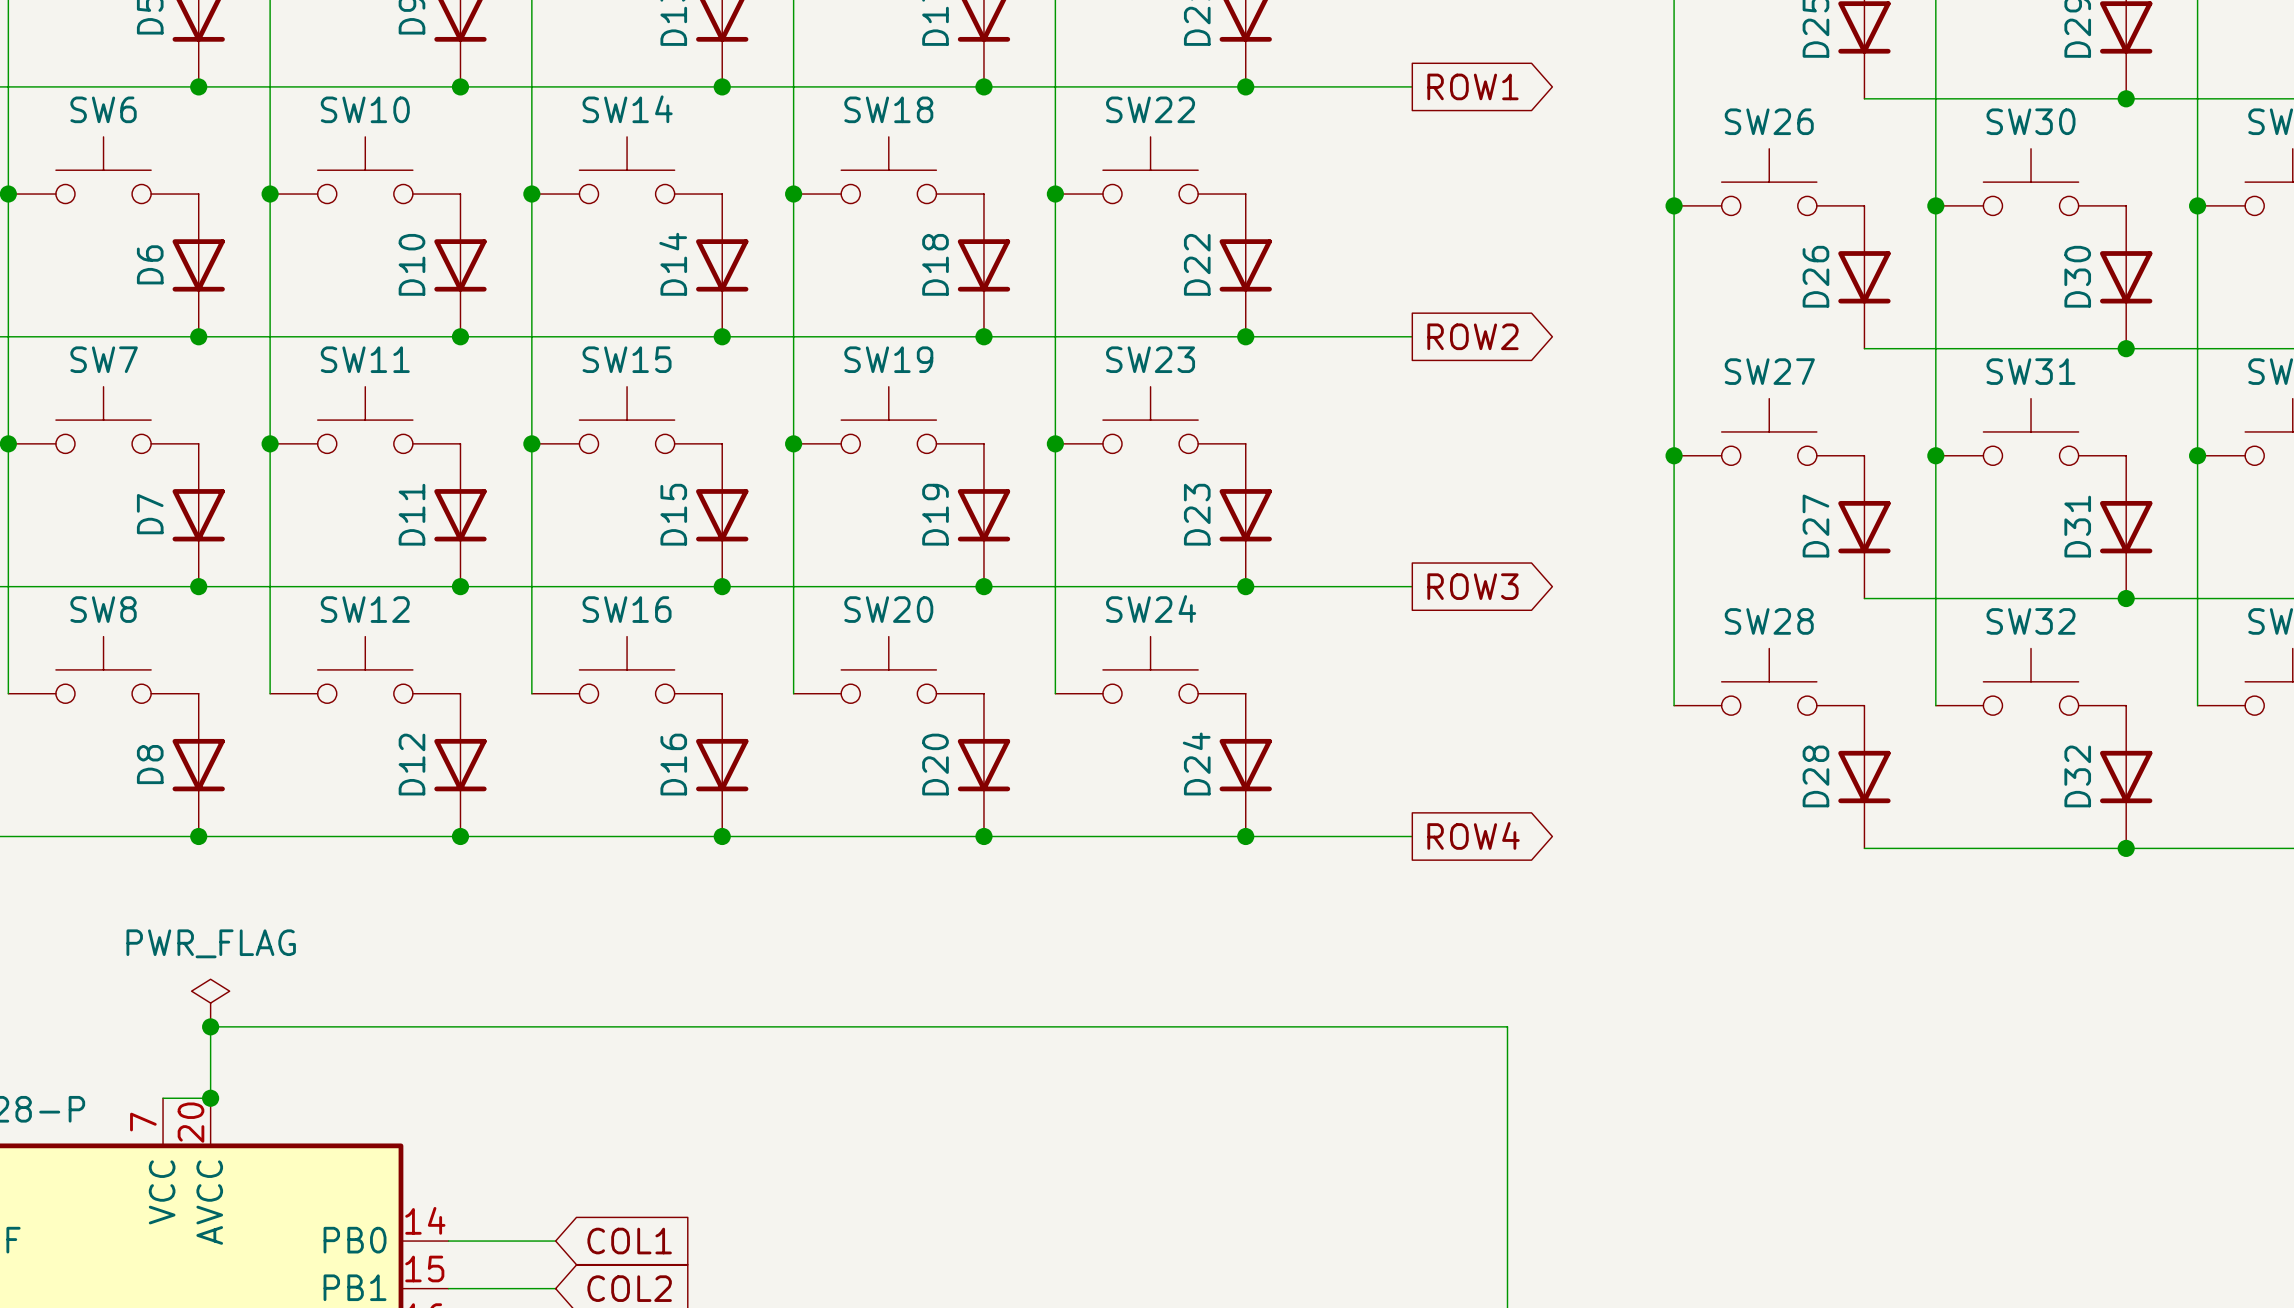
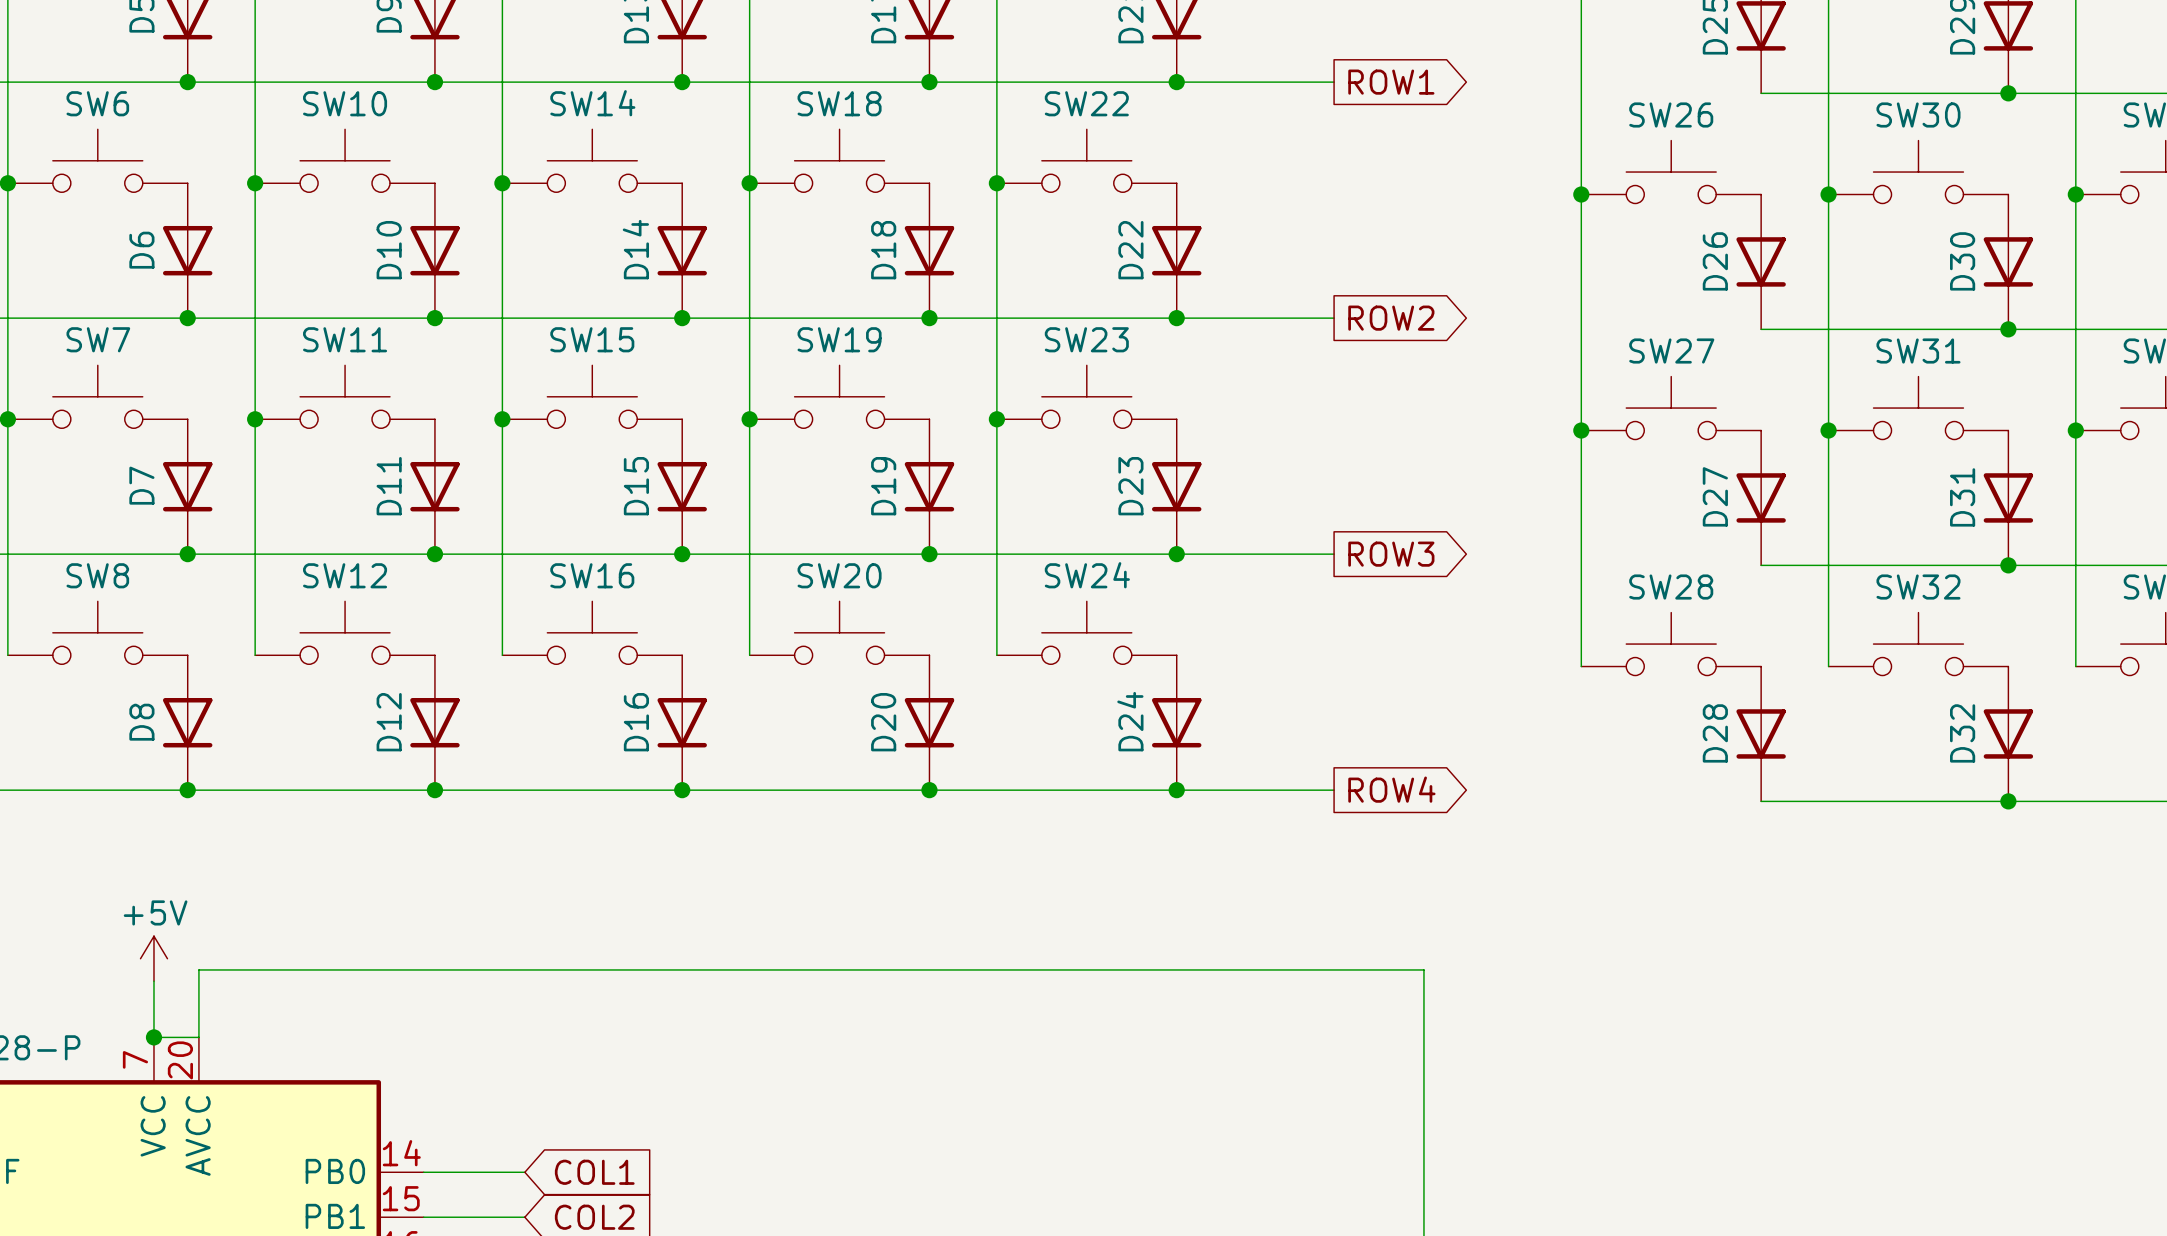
power symbol: PWR_FLAG (210, 1003) -> none
power symbol: none -> +5V (153, 958)
junction: (210, 1026) -> none
wire: none -> (153, 981) (153, 1037)
junction: none -> (153, 1037)
junction: (210, 1098) -> none

